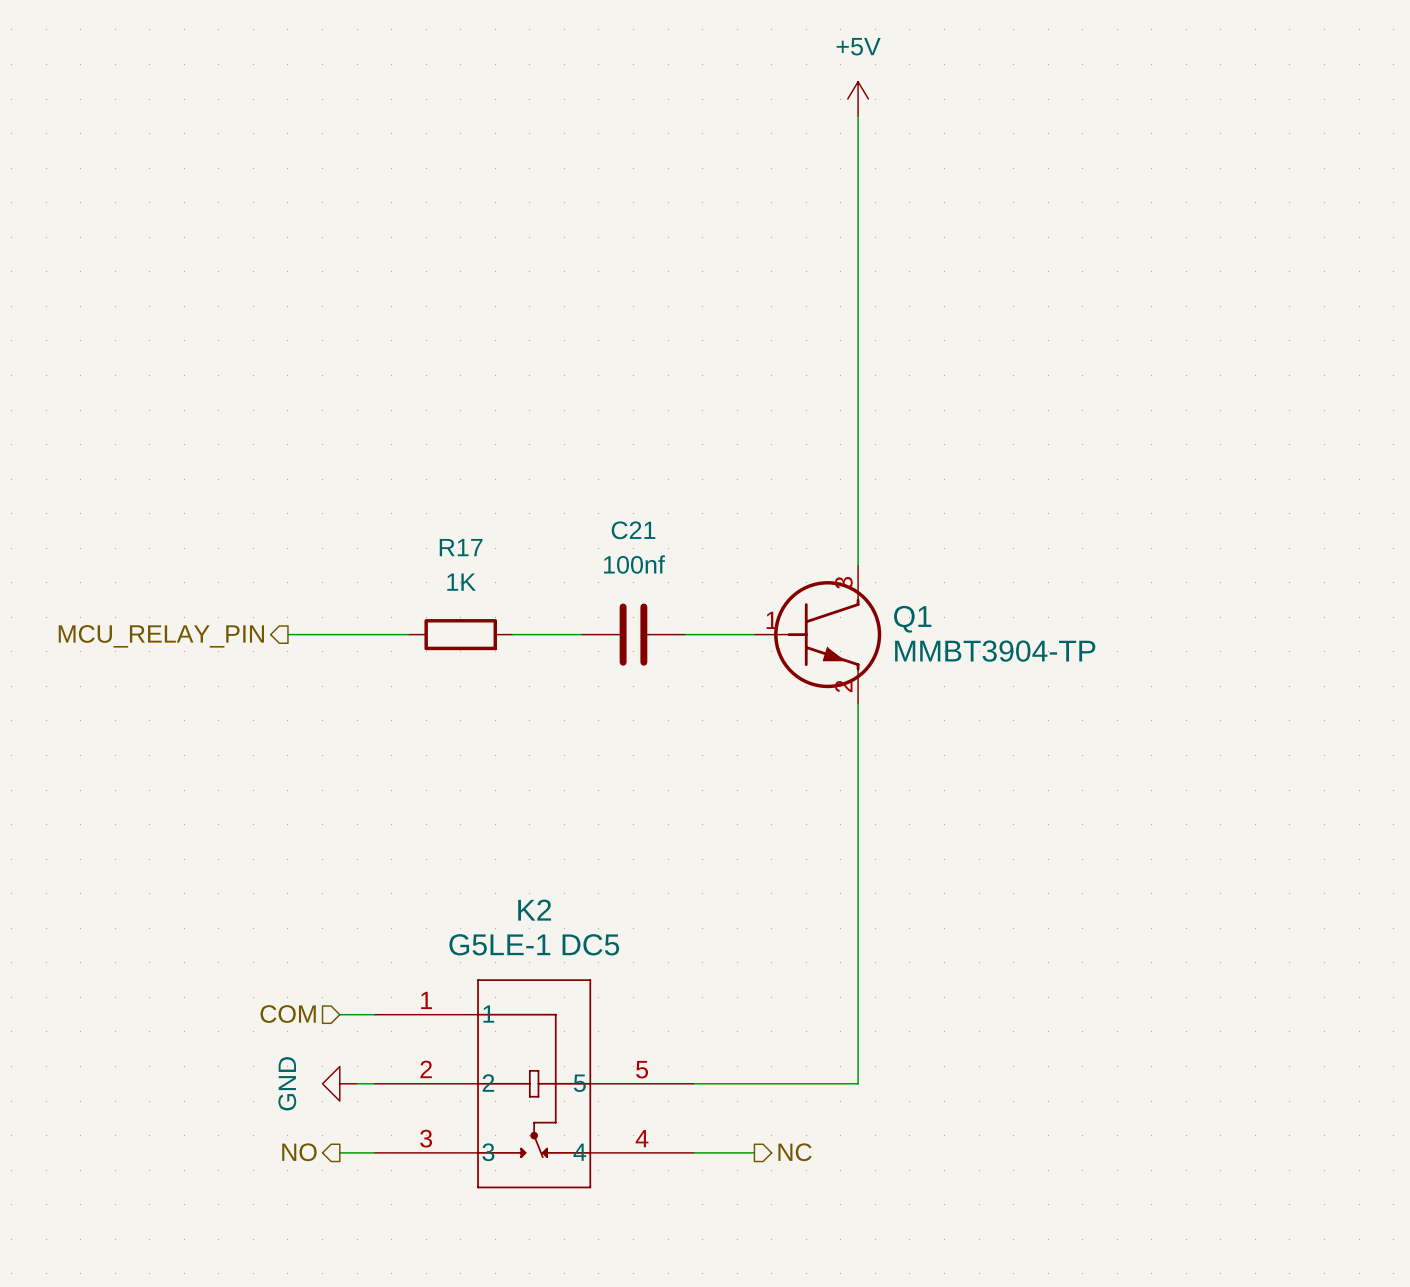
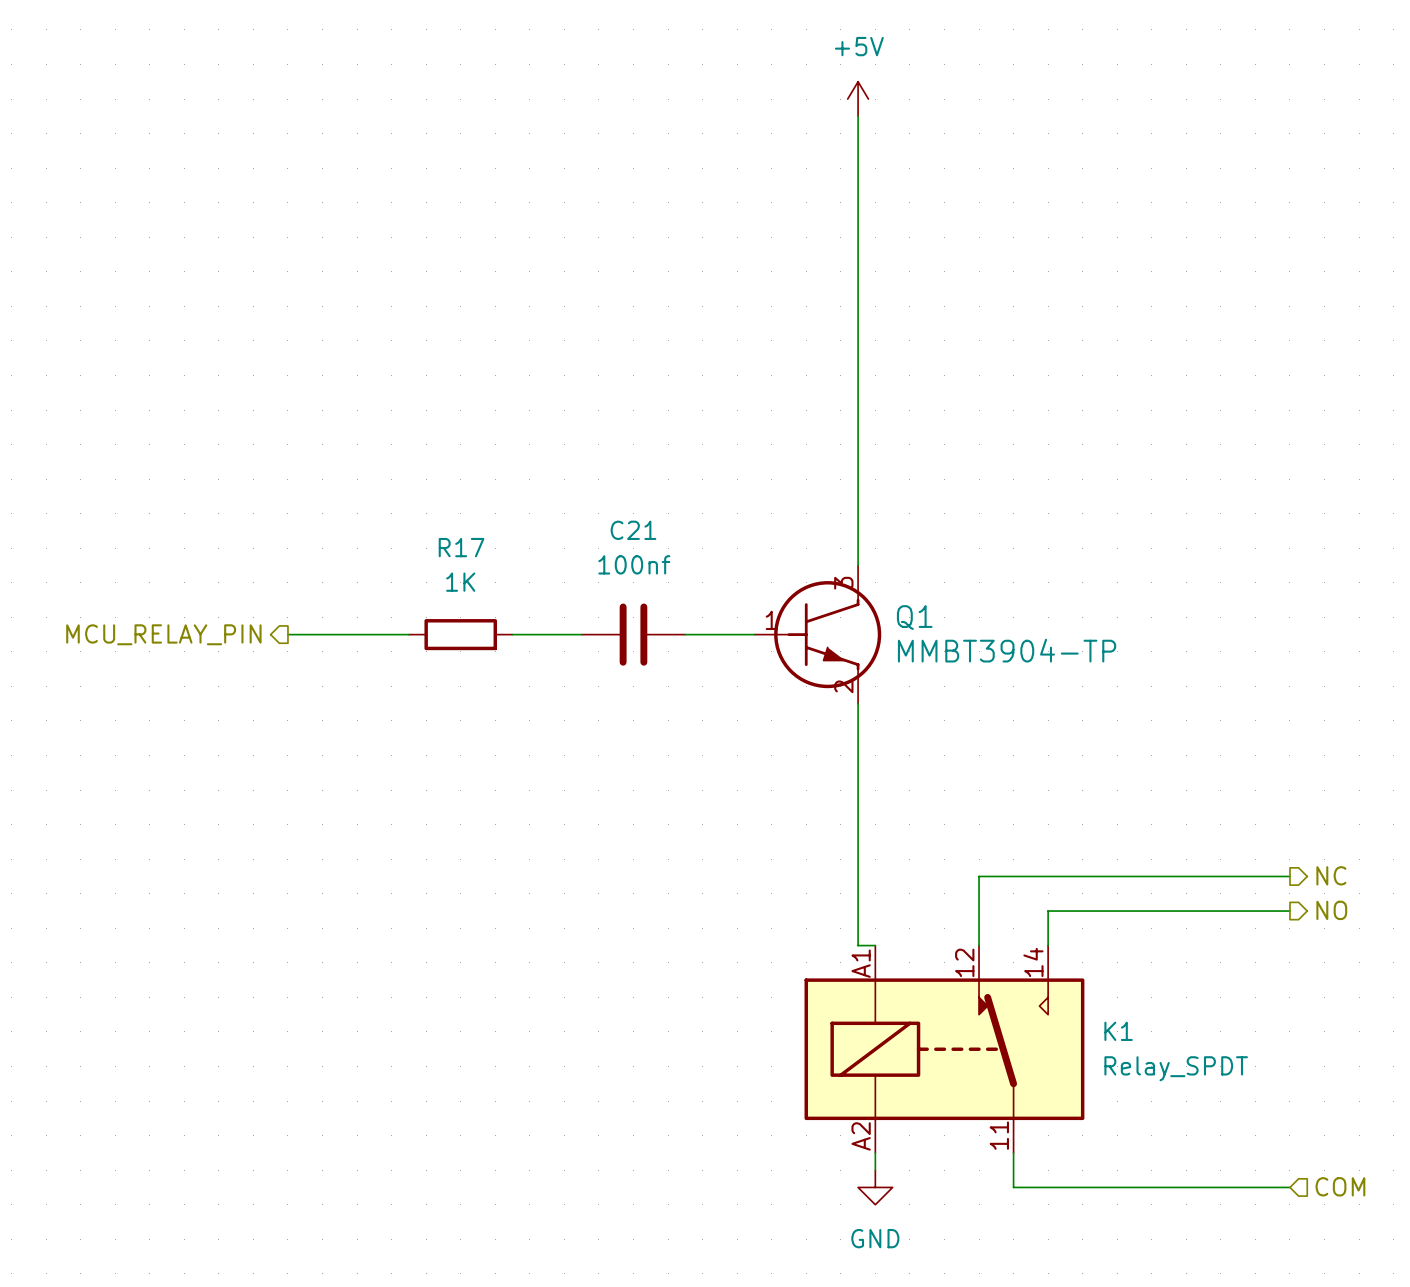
hierarchical label: none -> NC (1331, 875)
wire: none -> (1289, 876) (979, 876) (979, 945)
hierarchical label: none -> NO (1331, 910)
wire: none -> (1289, 911) (1048, 911) (1048, 945)
wire: (858, 945) (858, 1083) (693, 1083) -> (858, 945) (875, 945)
hierarchical label: COM (288, 1014) -> none
wire: (339, 1014) (374, 1014) -> none
K1: none -> Relay_SPDT (944, 1049)
power symbol: GND (339, 1083) -> none
wire: (357, 1083) (374, 1083) -> none
K2: G5LE-1 DC5 (534, 1083) -> none
hierarchical label: NO (299, 1152) -> none
wire: (339, 1152) (374, 1152) -> none
wire: (693, 1152) (754, 1152) -> none
hierarchical label: NC (795, 1152) -> none
wire: none -> (875, 1152) (875, 1170)
wire: none -> (1013, 1152) (1013, 1187) (1289, 1187)
hierarchical label: none -> COM (1340, 1186)
power symbol: none -> GND (875, 1187)

